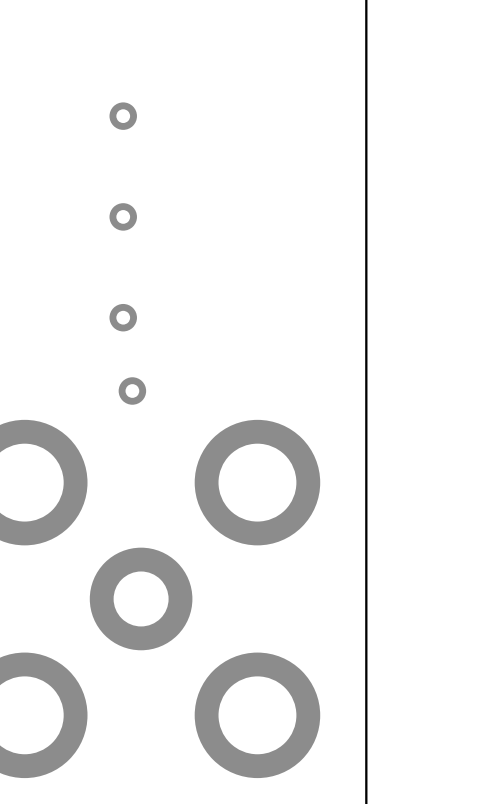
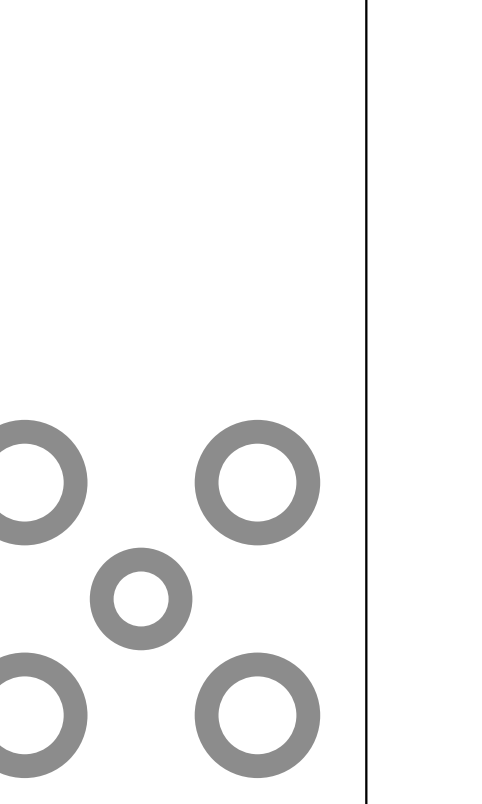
via: (123, 116) -> none
via: (123, 216) -> none
via: (123, 317) -> none
via: (132, 390) -> none

